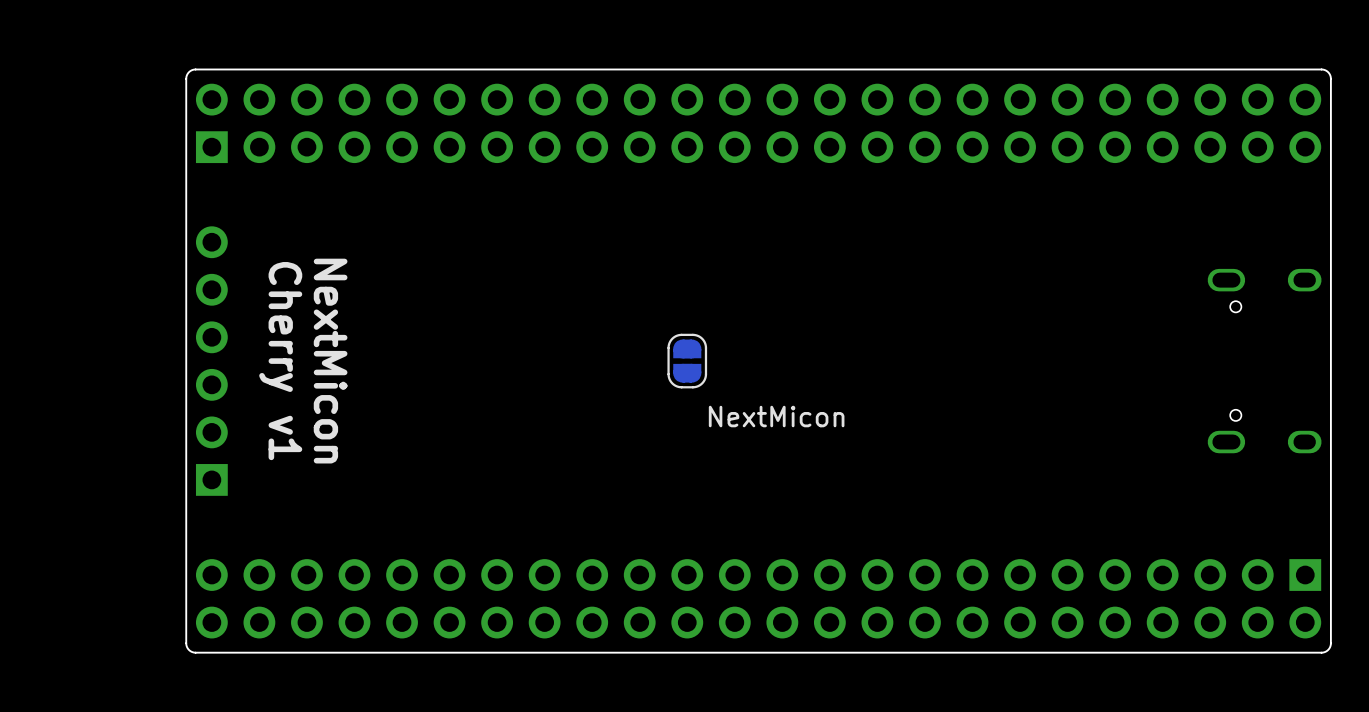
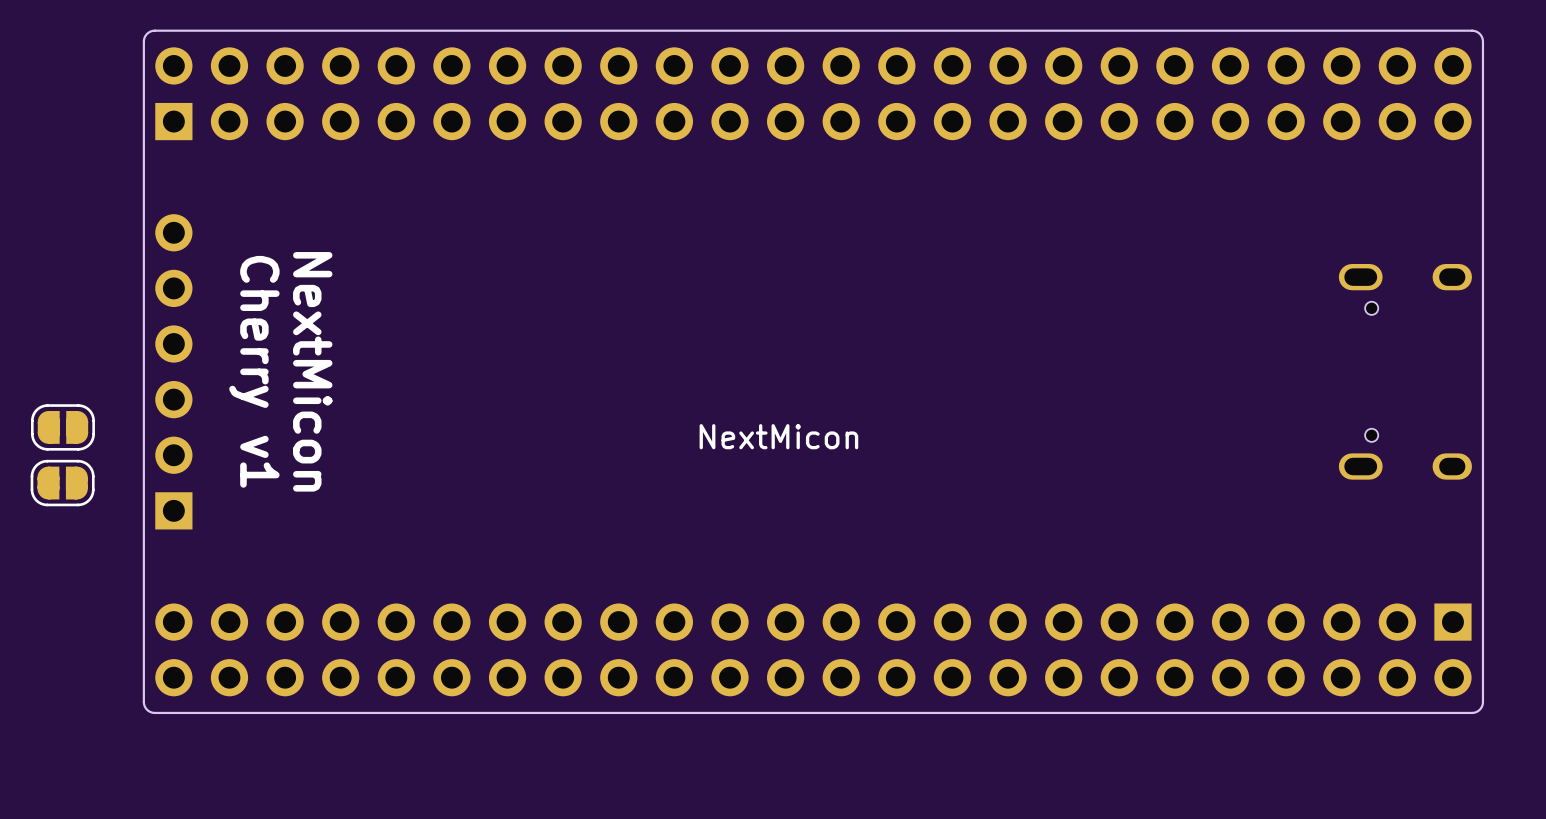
part: (687, 361) -> none
part: none -> (62, 427)
text position: NextMicon (776, 416) -> NextMicon (778, 436)
part: none -> (62, 483)

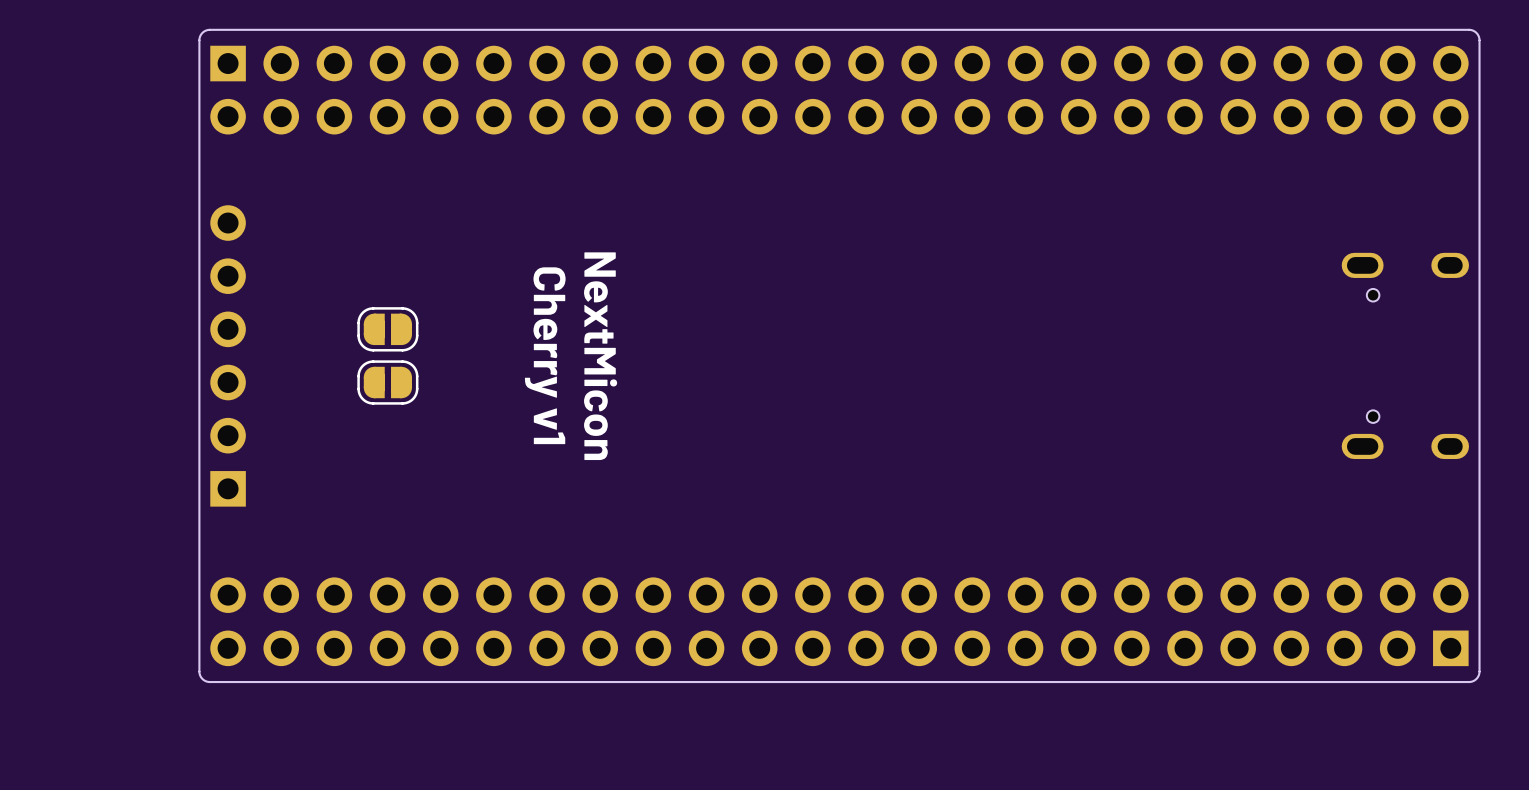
part side: bottom (813, 93) -> top (839, 90)
part: none -> (387, 329)
text position: Cherry v1 (254, 371) -> Cherry v1 (545, 355)
text: NextMicon (312, 371) -> none
text: none -> NextMicon (600, 356)
part: none -> (387, 382)
part: (62, 427) -> none
text: NextMicon (778, 436) -> none
part: (62, 483) -> none
part side: bottom (813, 649) -> top (839, 621)

